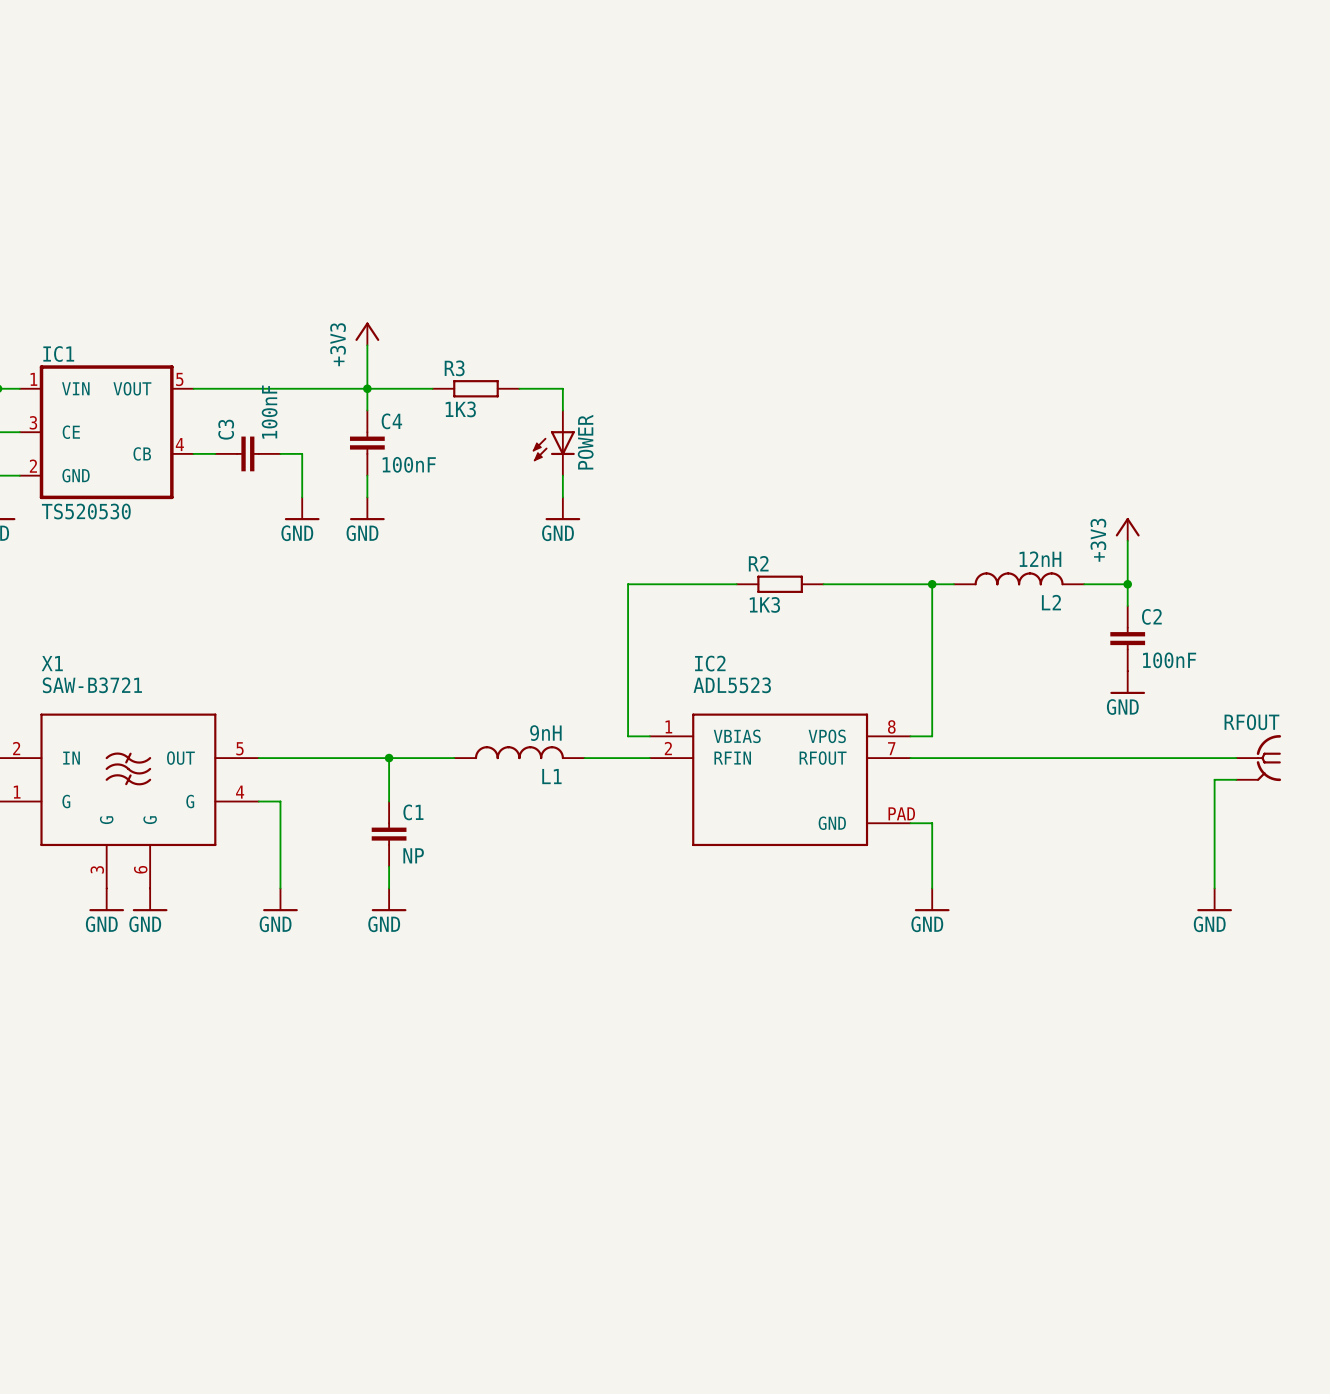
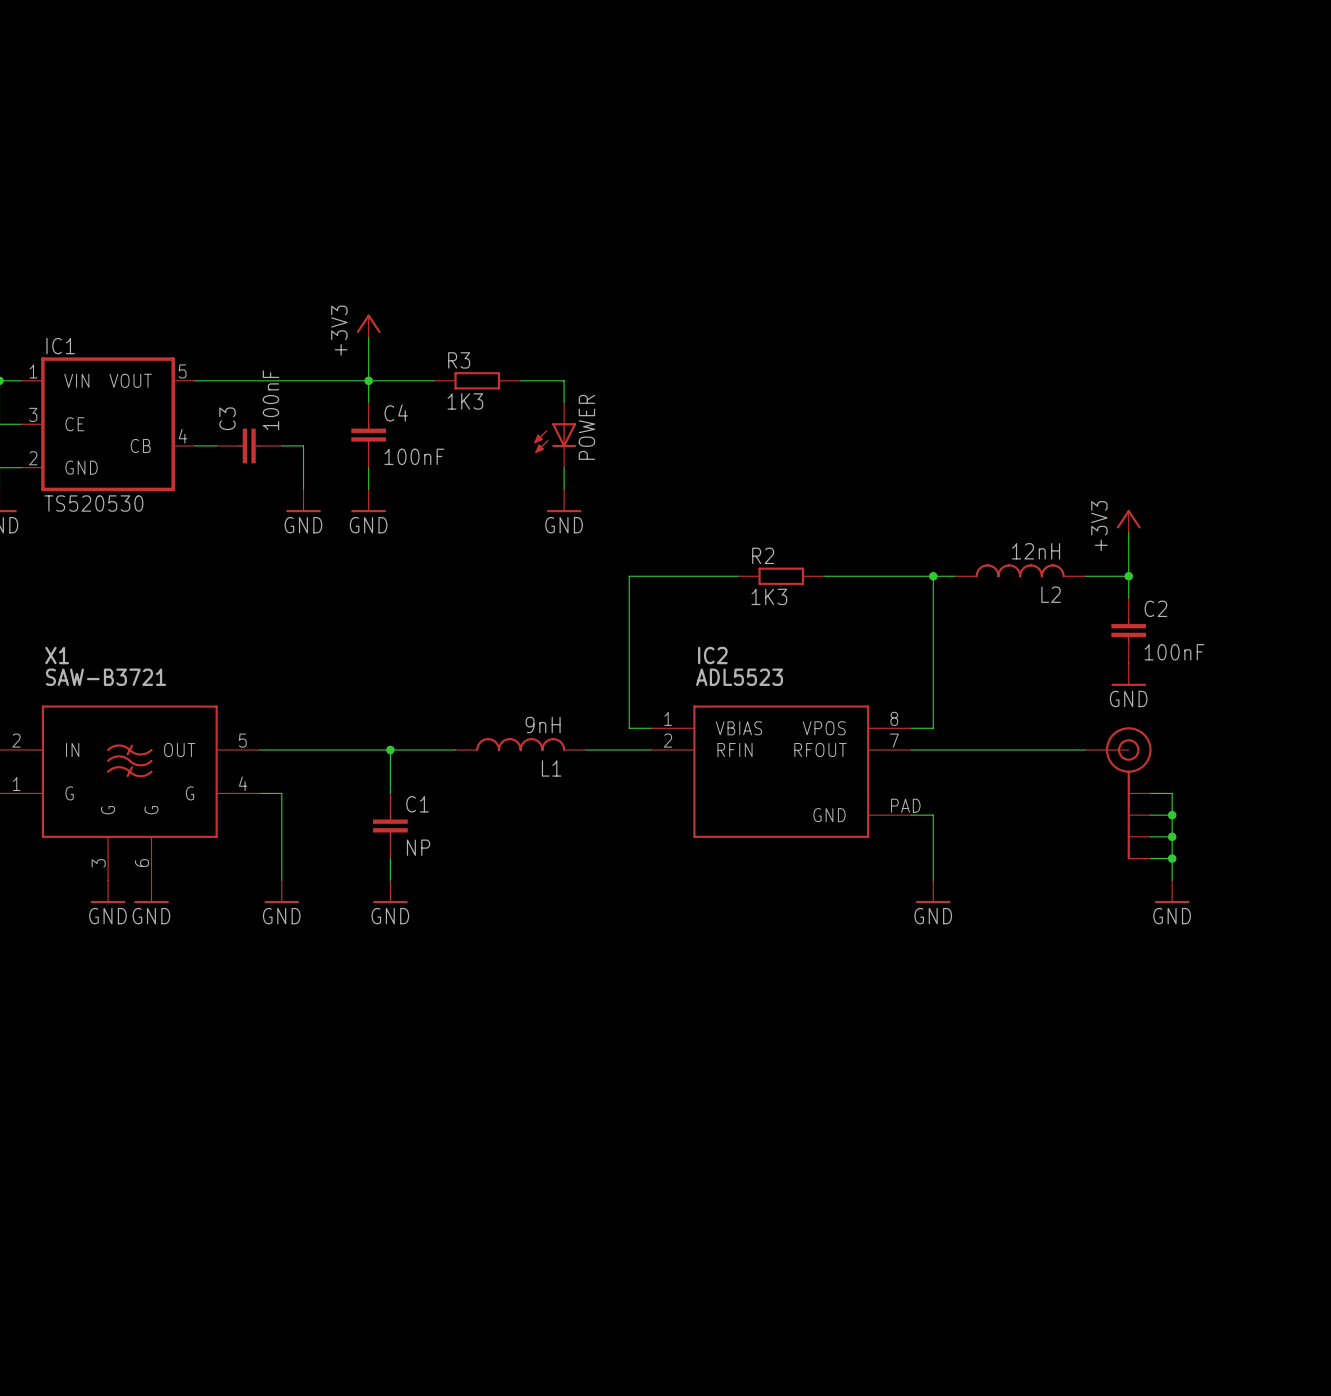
wire: (1084, 758) (1236, 758) -> none
RFOUT: (1258, 758) -> none
wire: (1236, 779) (1214, 779) (1214, 888) -> none
part: none -> (1118, 793)
wire: none -> (1150, 793) (1172, 793) (1172, 880)
wire: none -> (1150, 815) (1172, 815)
junction: none -> (1172, 815)
wire: none -> (1150, 836) (1172, 836)
junction: none -> (1172, 836)
wire: none -> (1150, 858) (1172, 858)
junction: none -> (1172, 858)
power symbol position: GND (1214, 899) -> GND (1172, 891)

